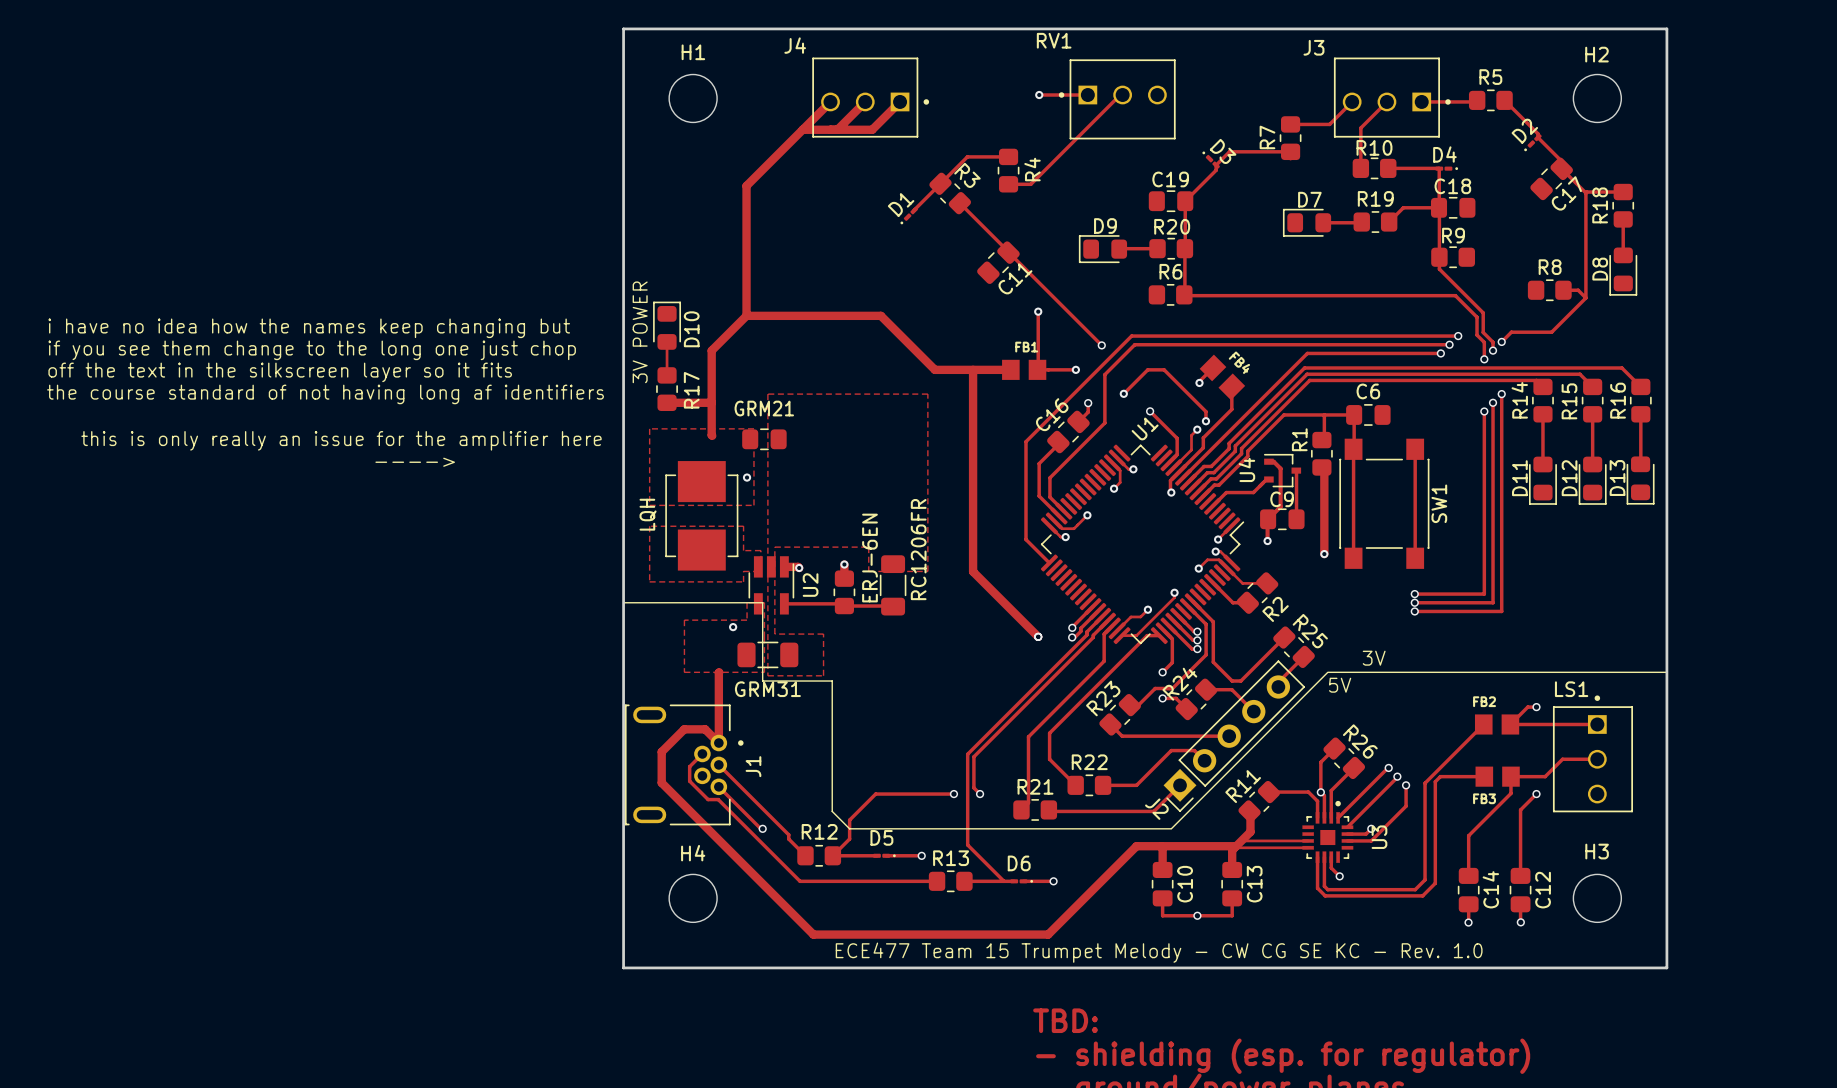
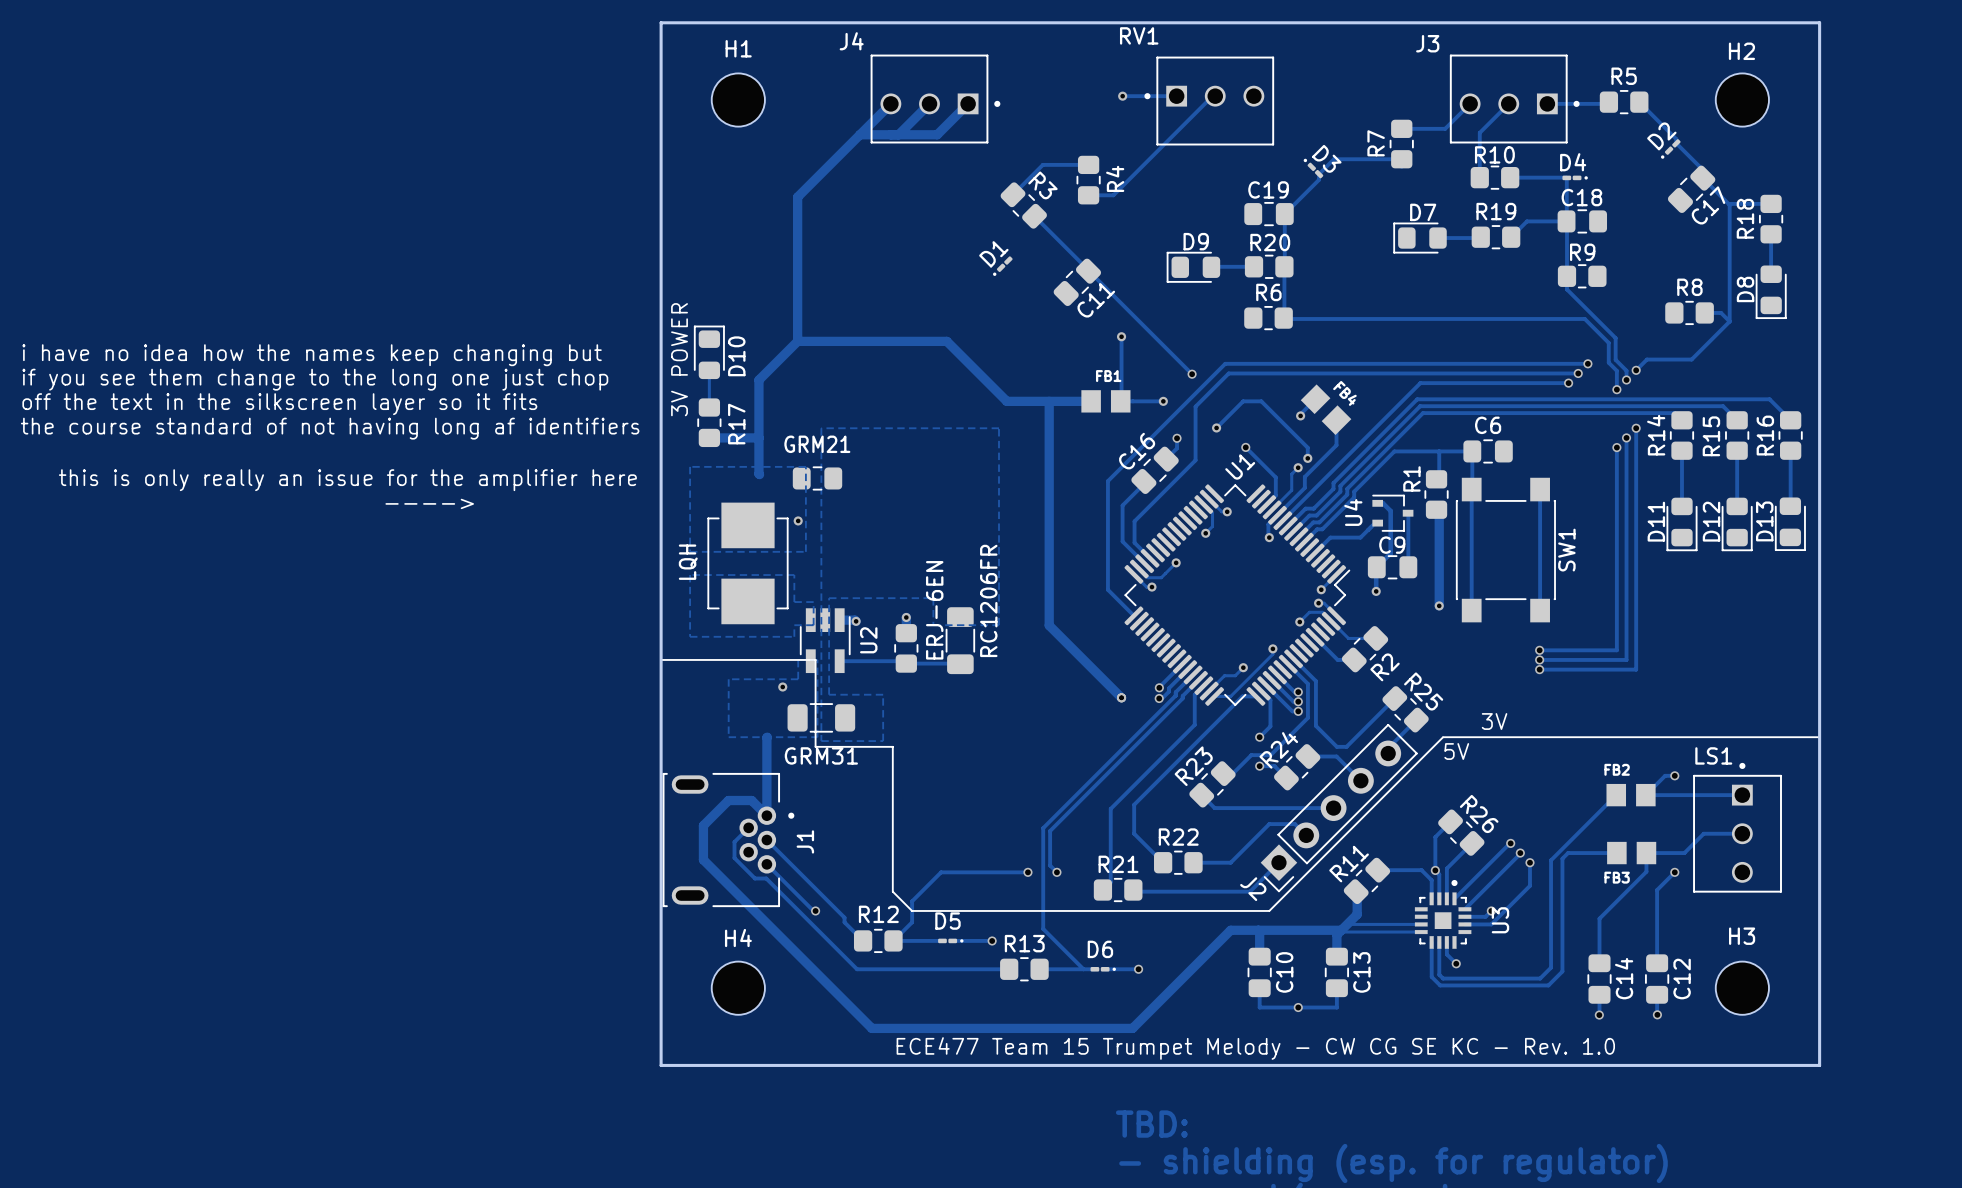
track: (940, 183) (914, 210) -> none
D1 position: (909, 215) -> (1002, 266)

